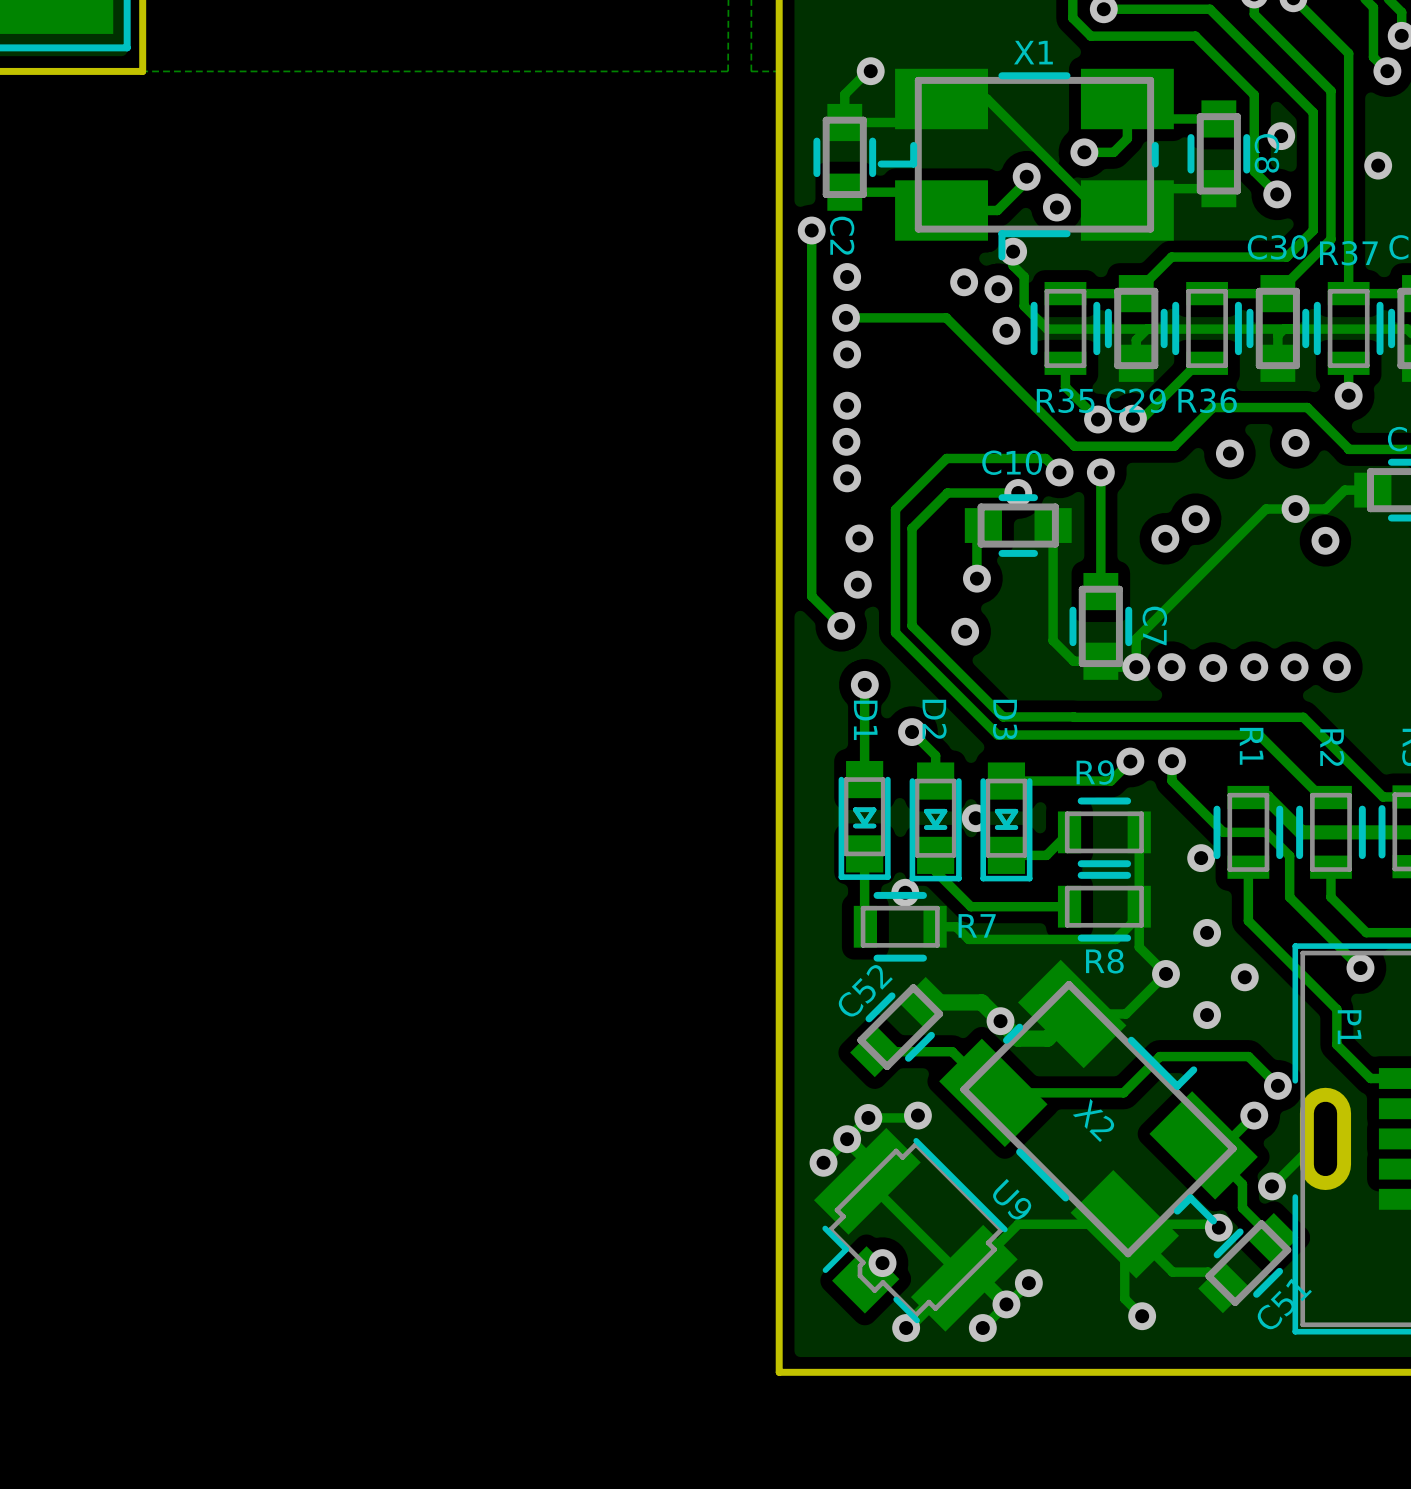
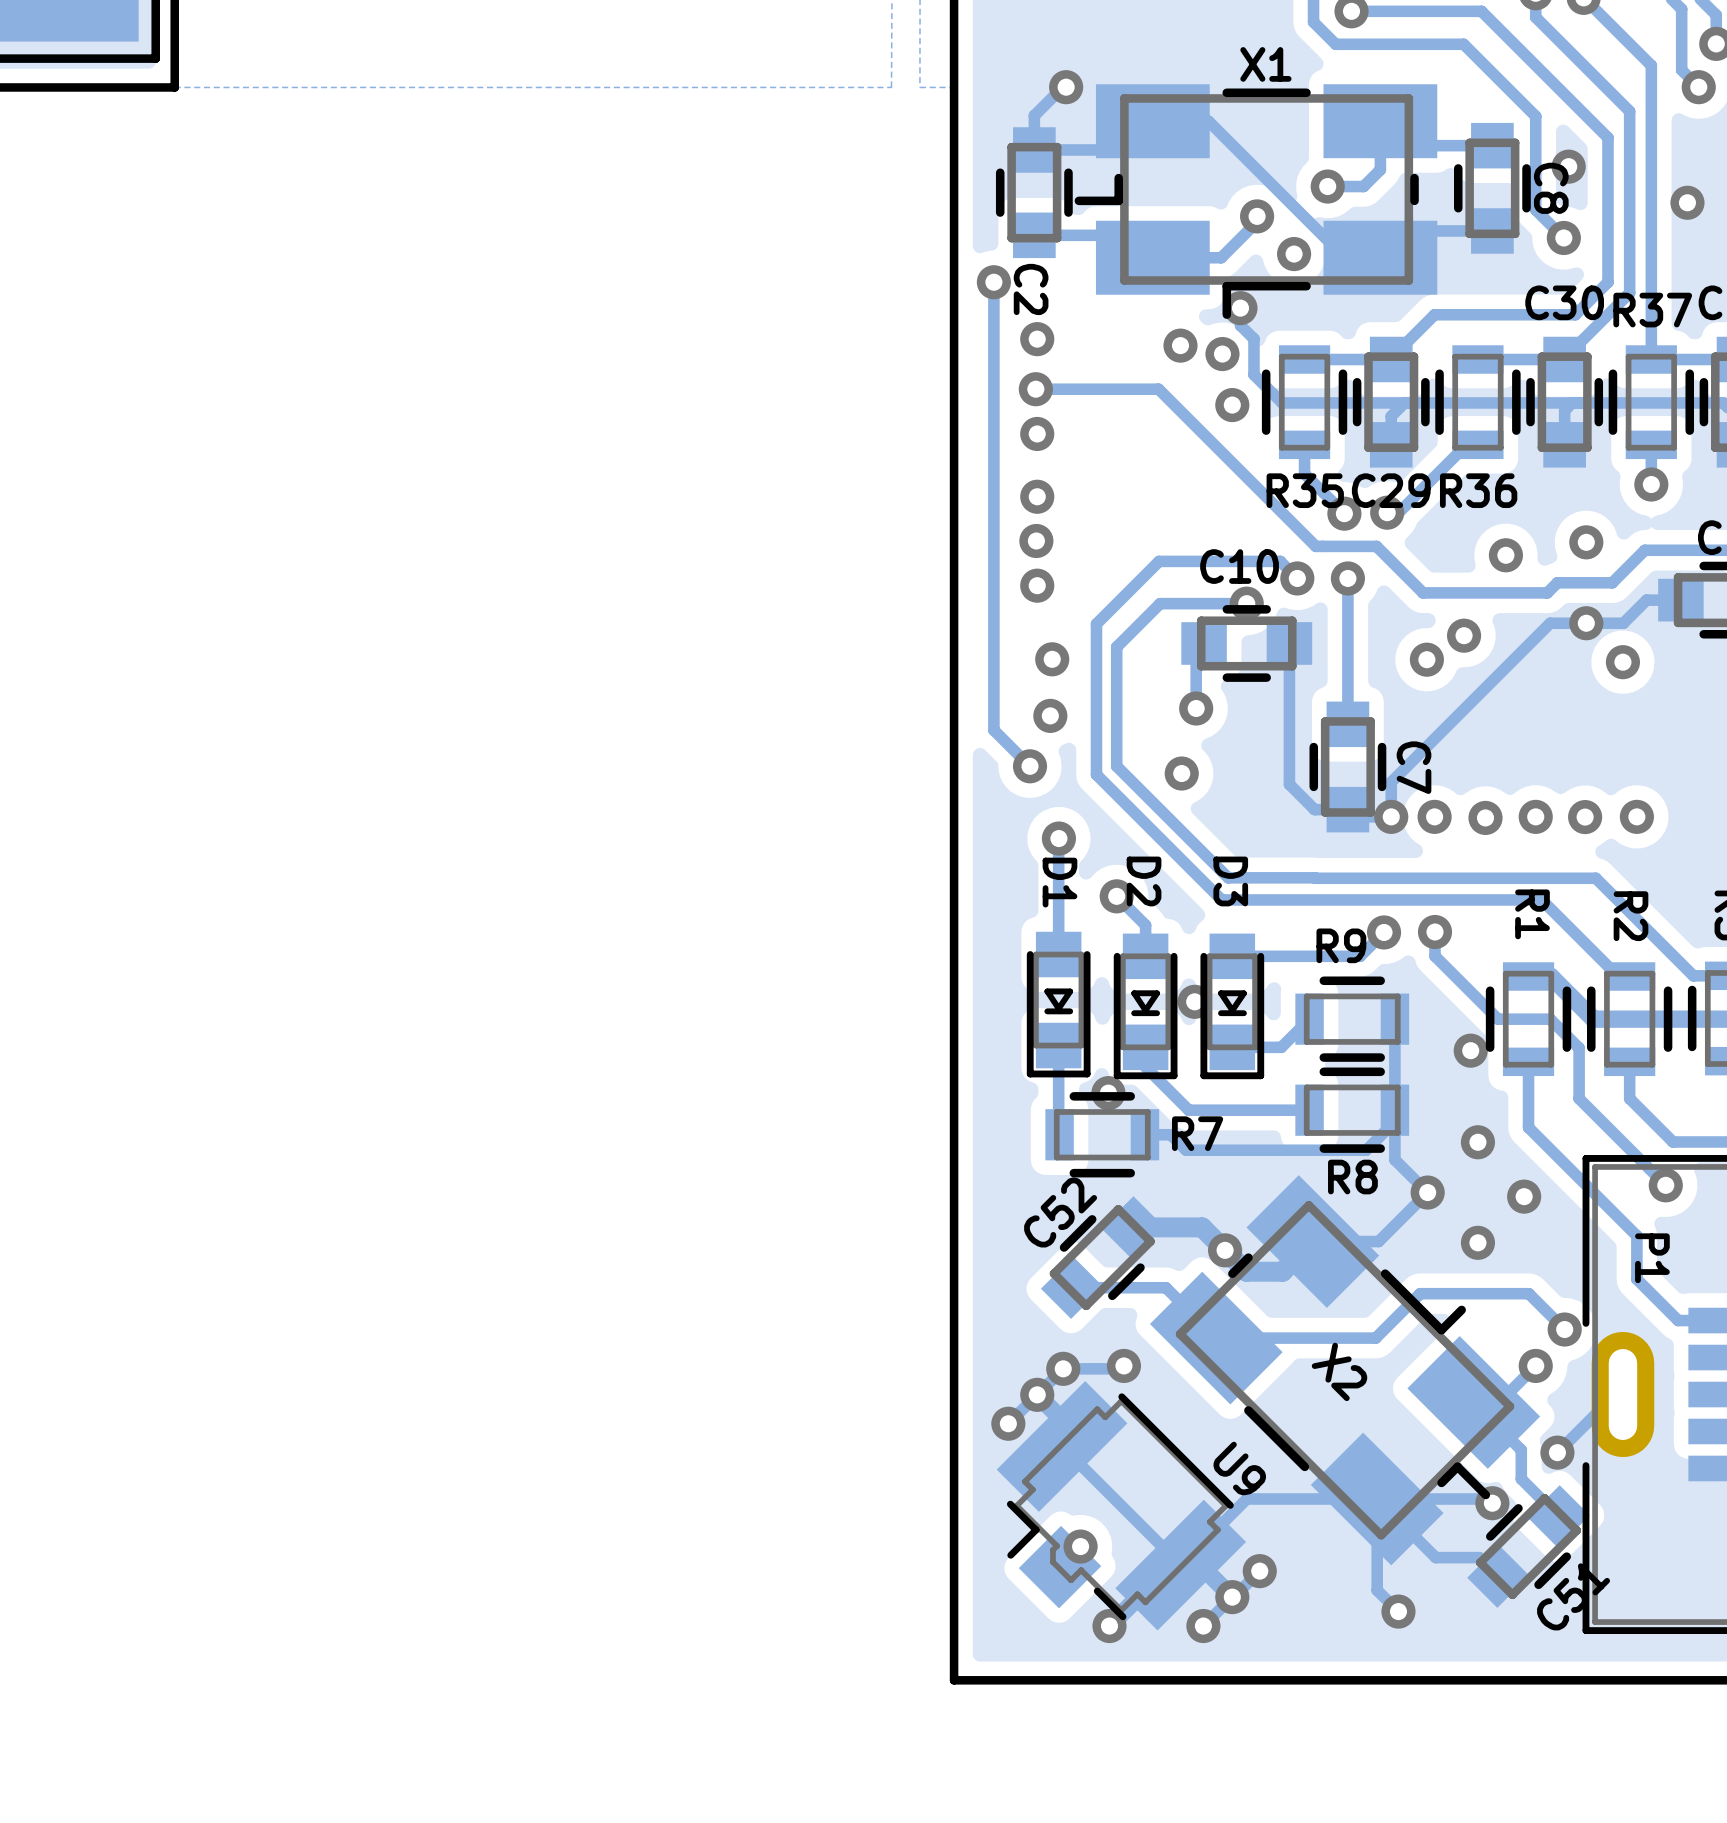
track: (1124, 446) (1174, 446) (1212, 407) (1307, 407) (1348, 448) -> (1376, 546) (1423, 592) (1547, 592) (1557, 582) (1612, 582) (1644, 550) (1651, 550)

